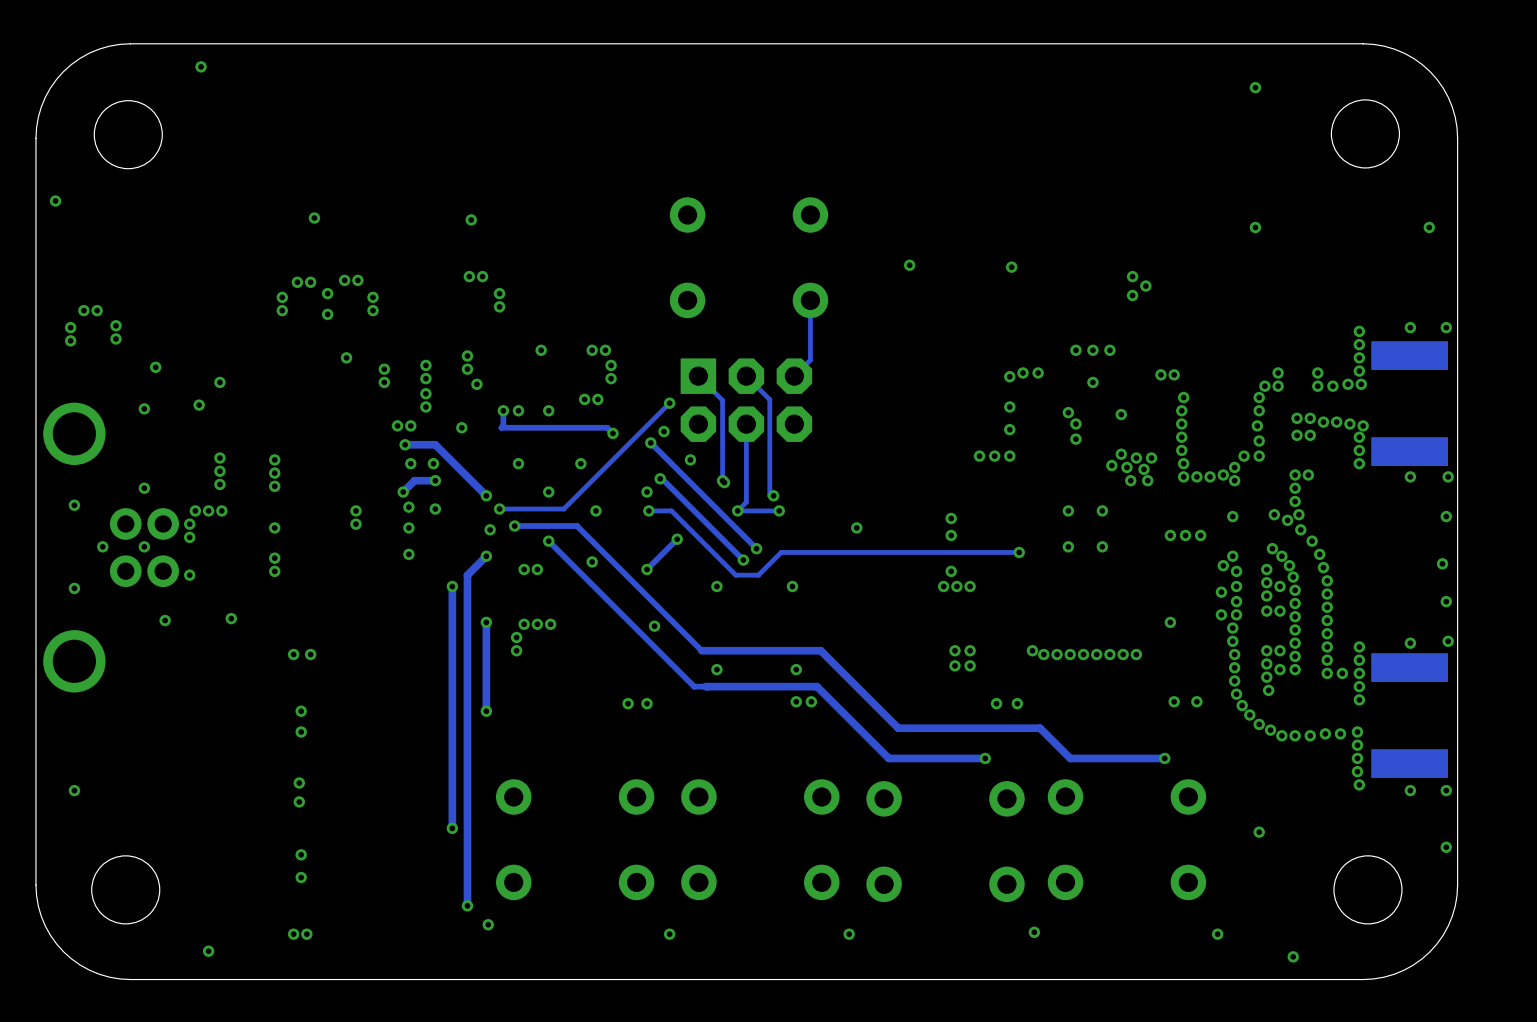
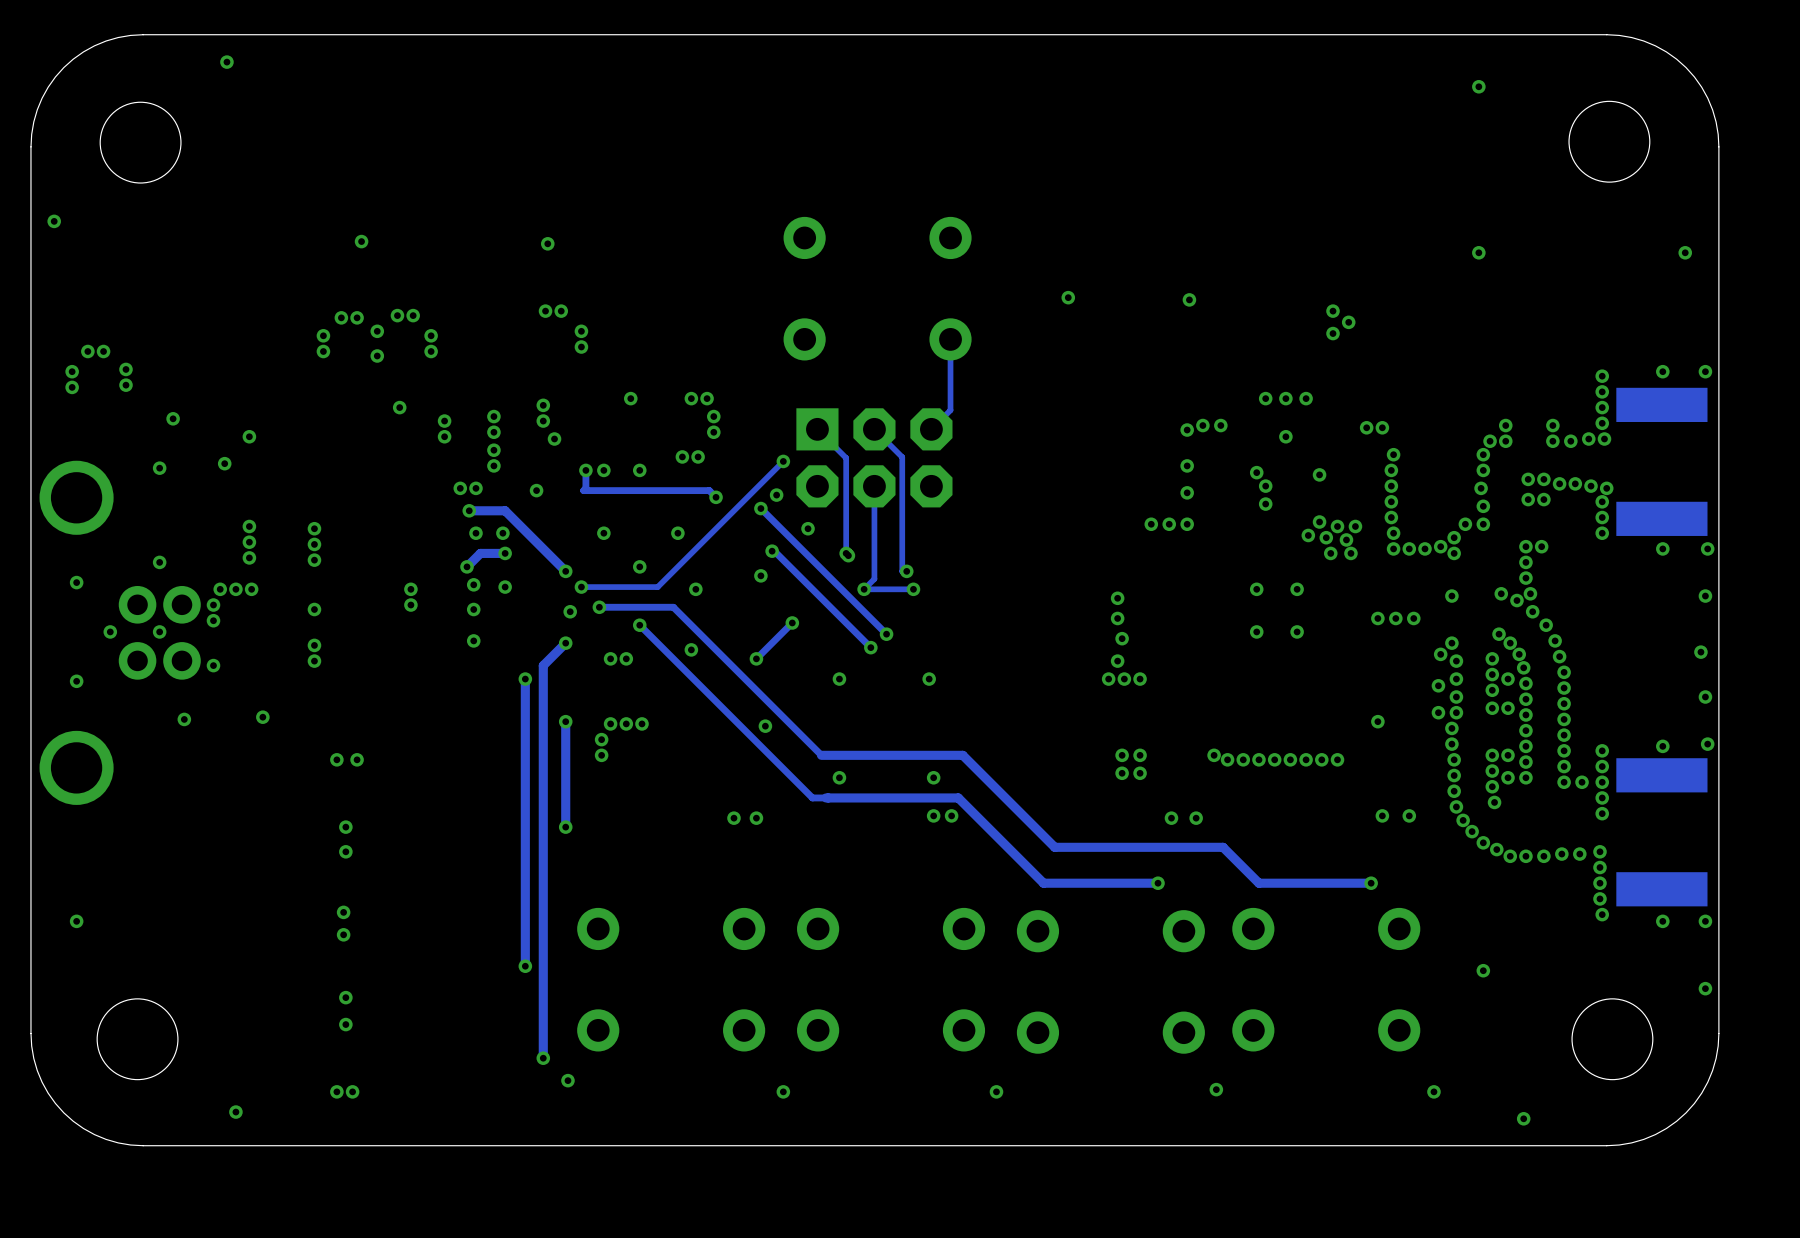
via: (646, 492) -> none
via: none -> (760, 575)
track: (648, 510) (671, 510) (735, 575) (758, 575) (781, 552) (1019, 552) -> none
via: (648, 510) -> none
via: (856, 527) -> none
via: none -> (1122, 638)
via: (1019, 552) -> none

